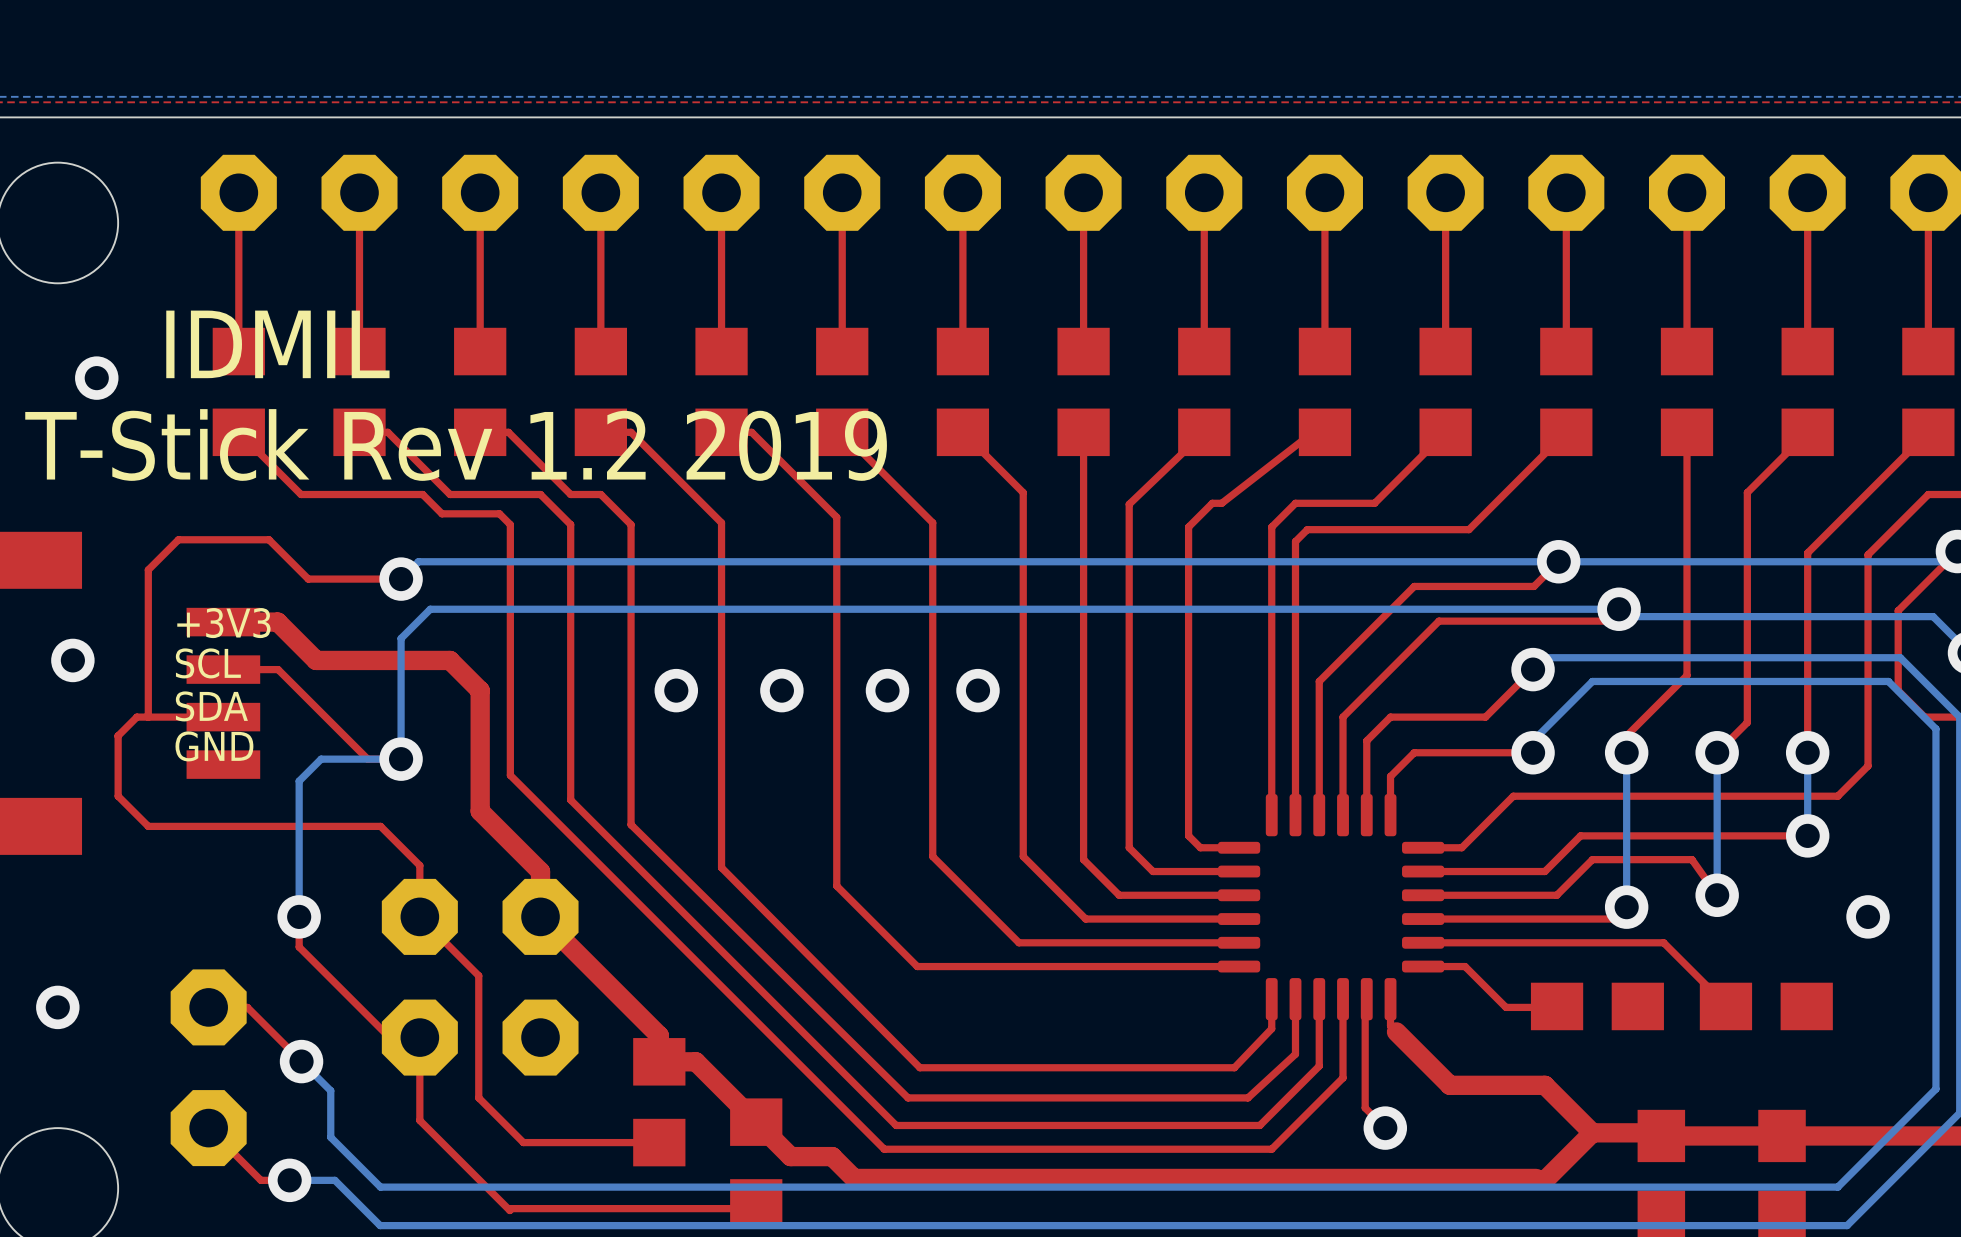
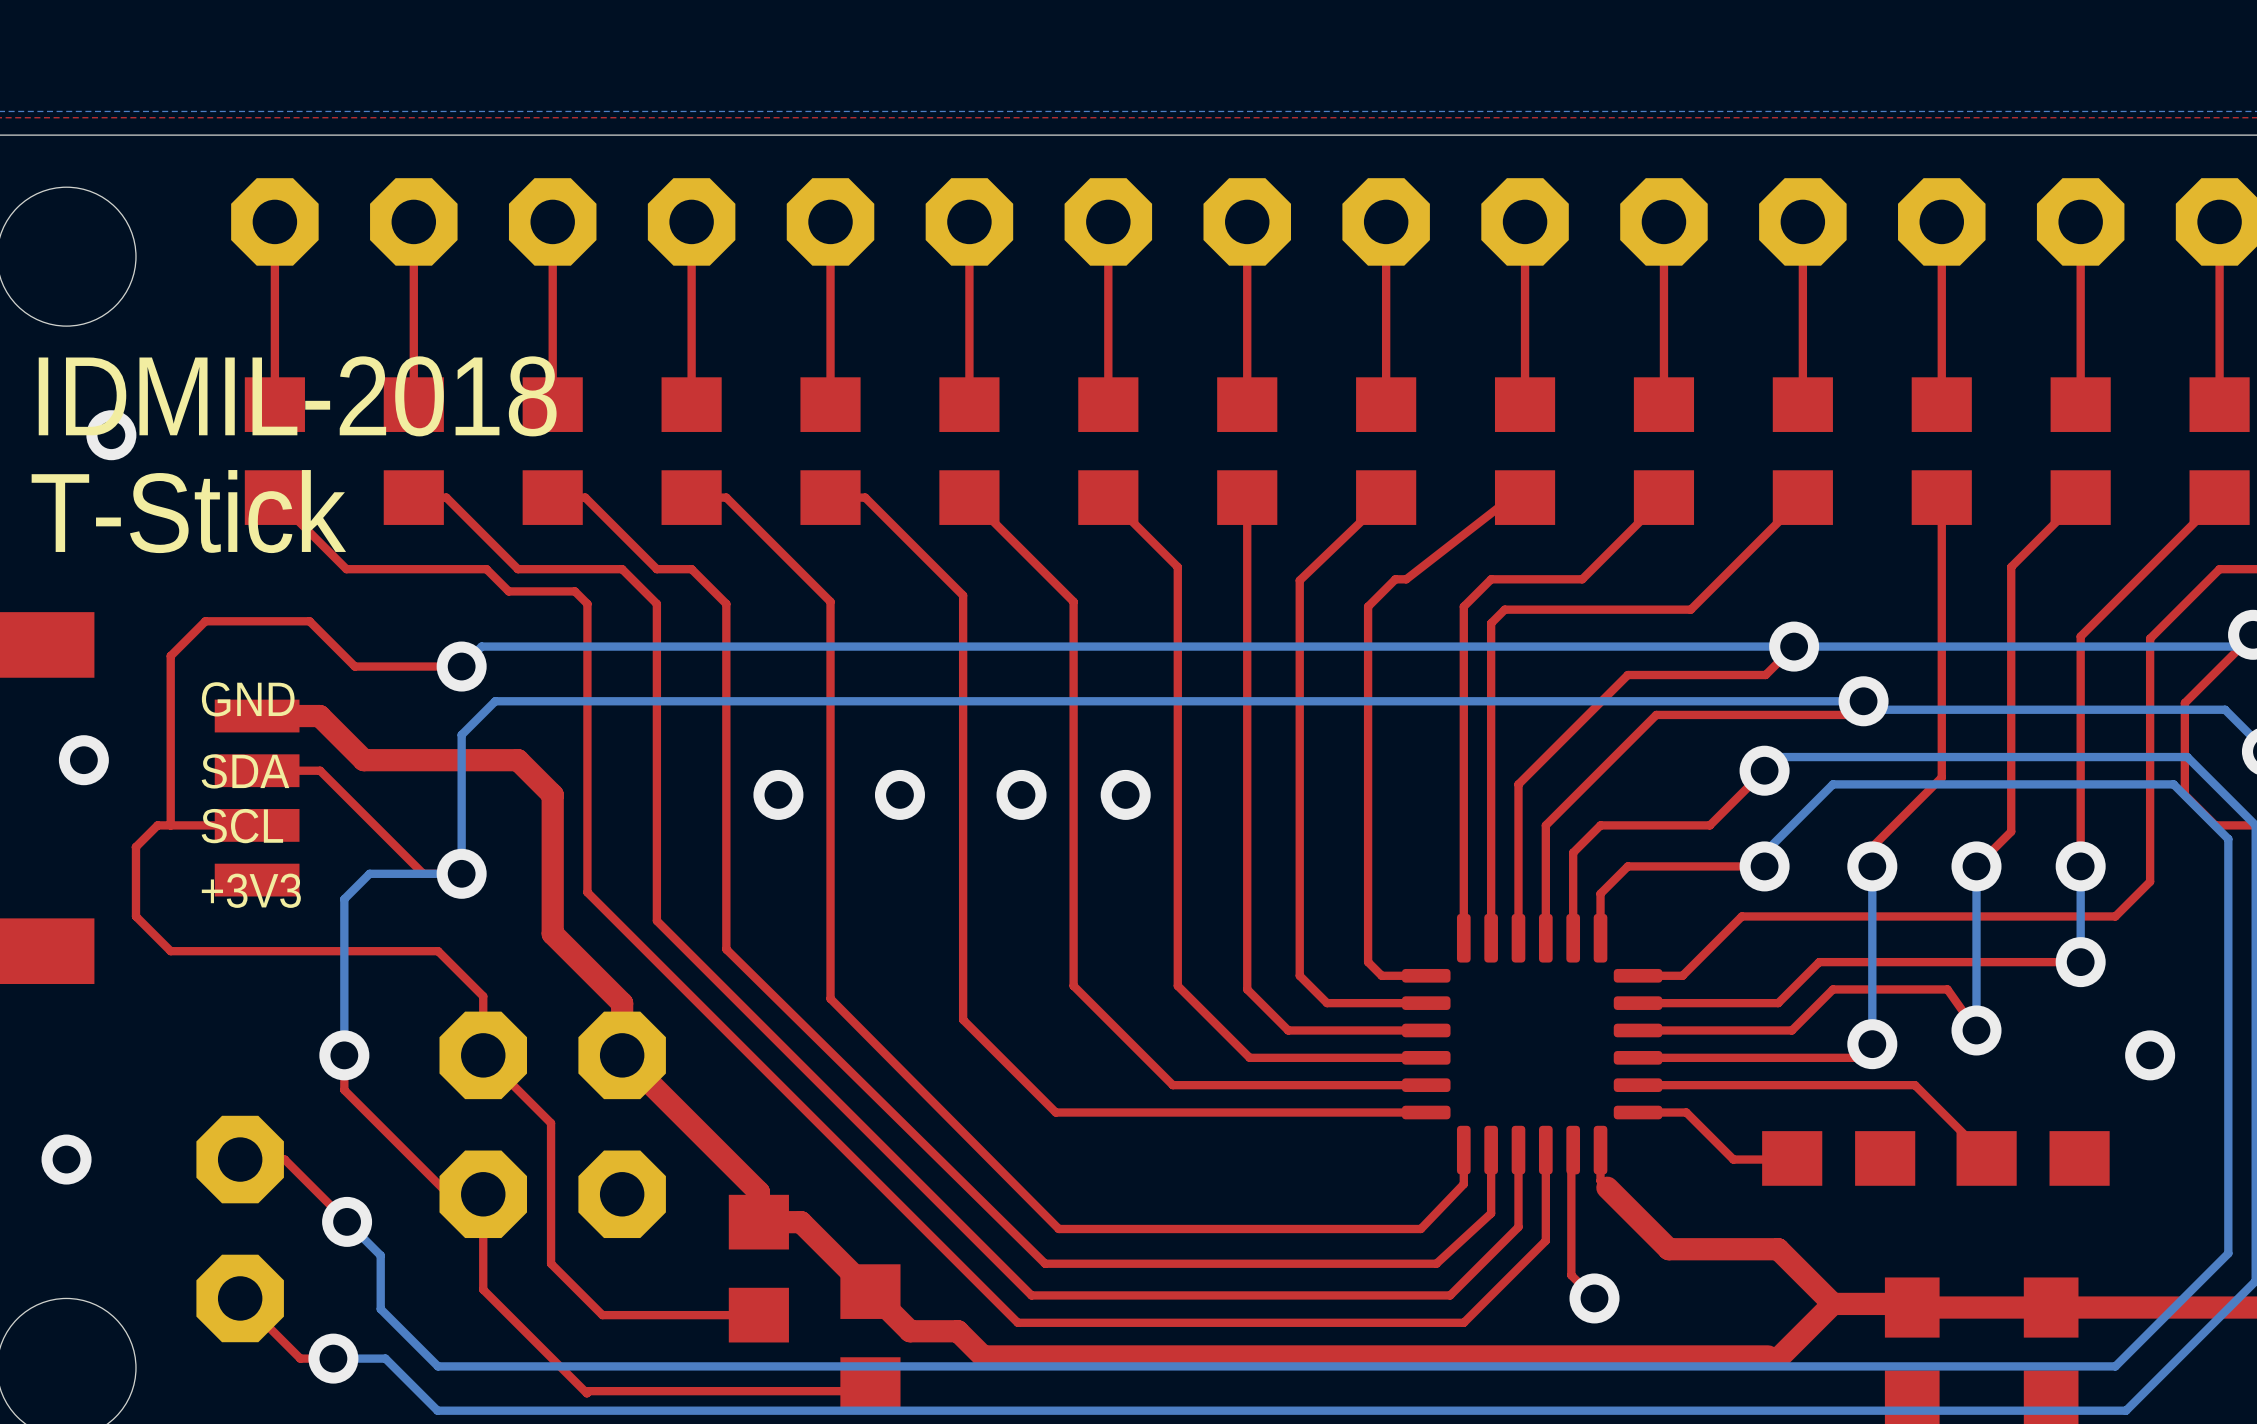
text: IDMIL (277, 344) -> IDMIL-2018 (297, 396)
text: T-Stick Rev 1.2 2019 (456, 444) -> T-Stick (188, 511)
text position: +3V3 (223, 623) -> +3V3 (251, 890)
text position: SCL (208, 663) -> SCL (242, 826)
text position: SDA (211, 706) -> SDA (245, 771)
text position: GND (214, 746) -> GND (248, 699)

